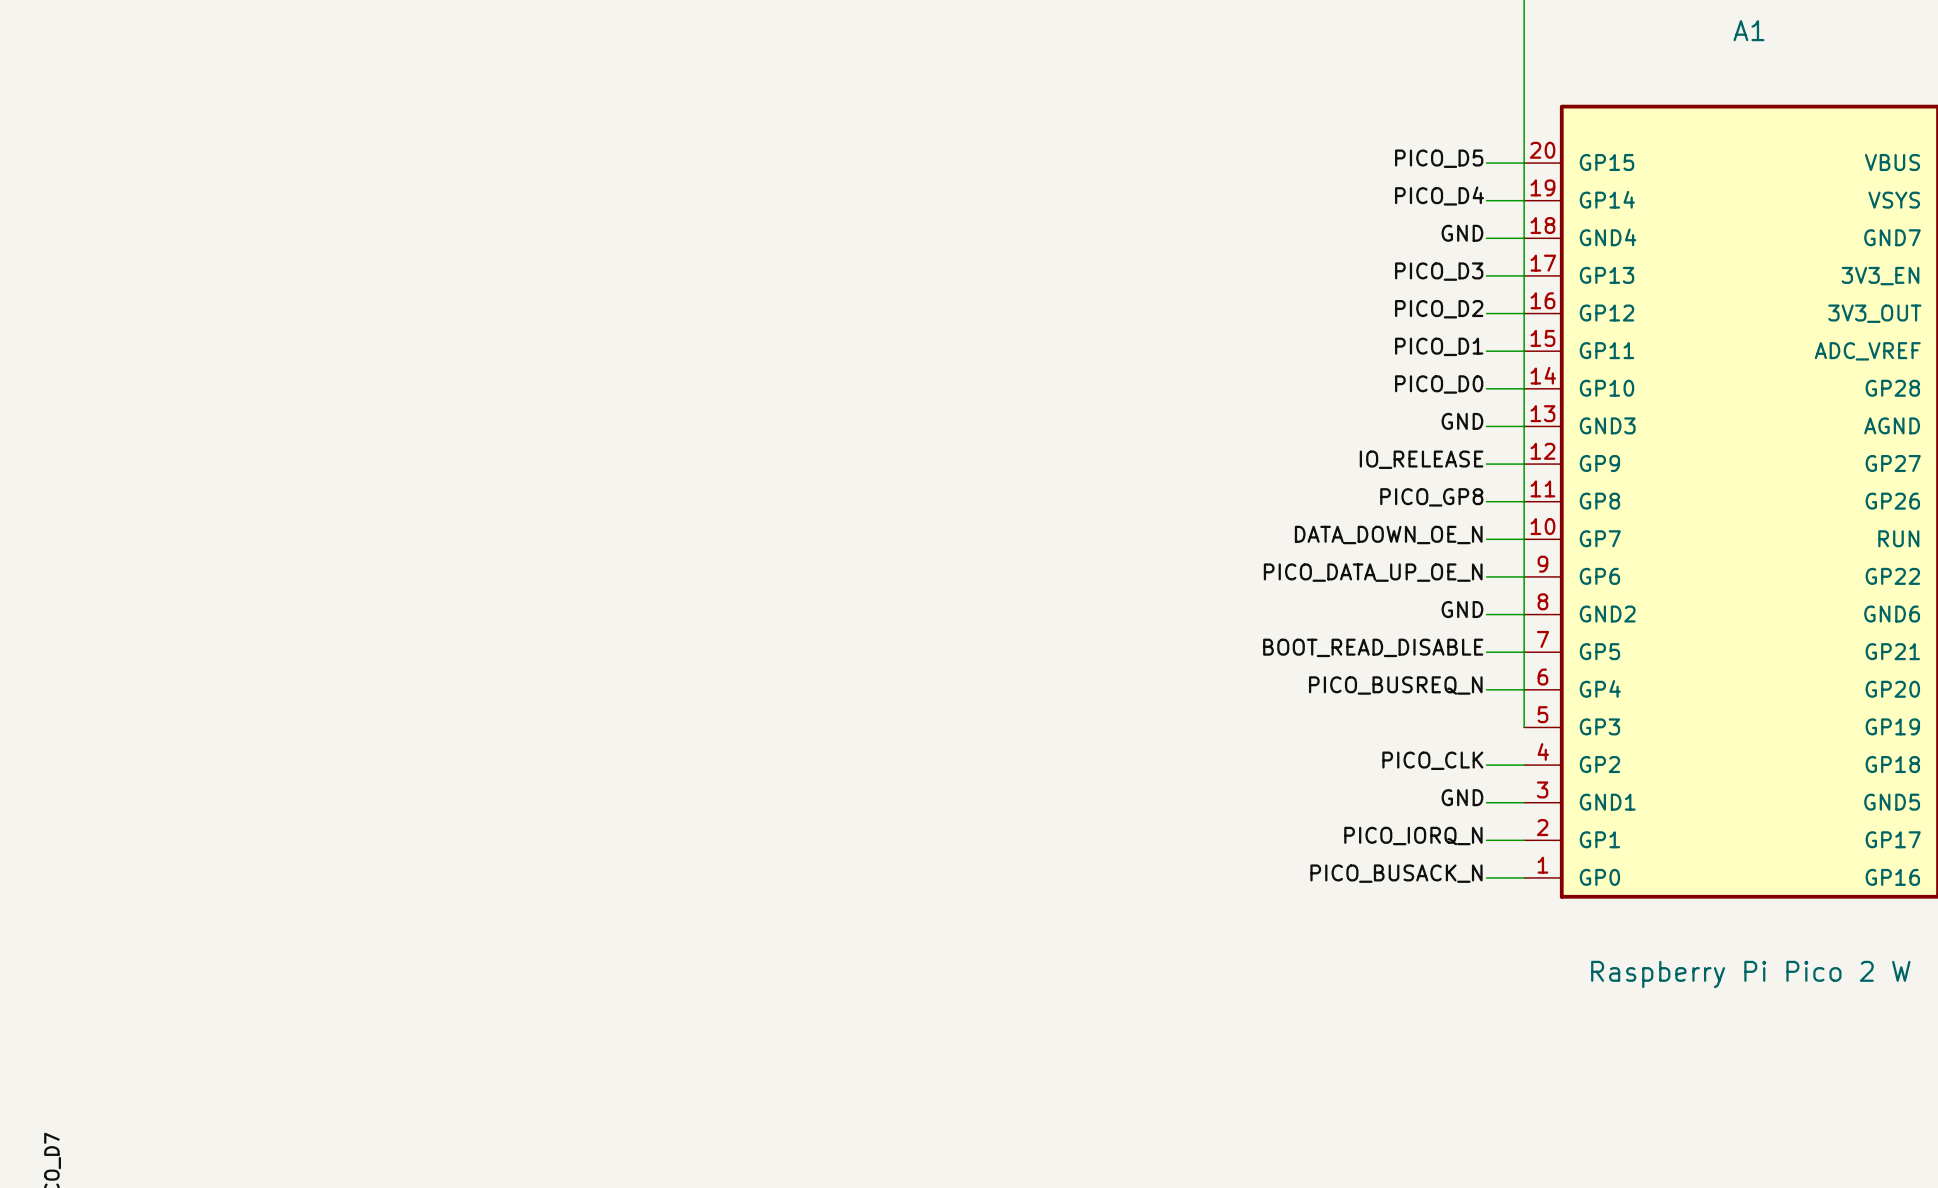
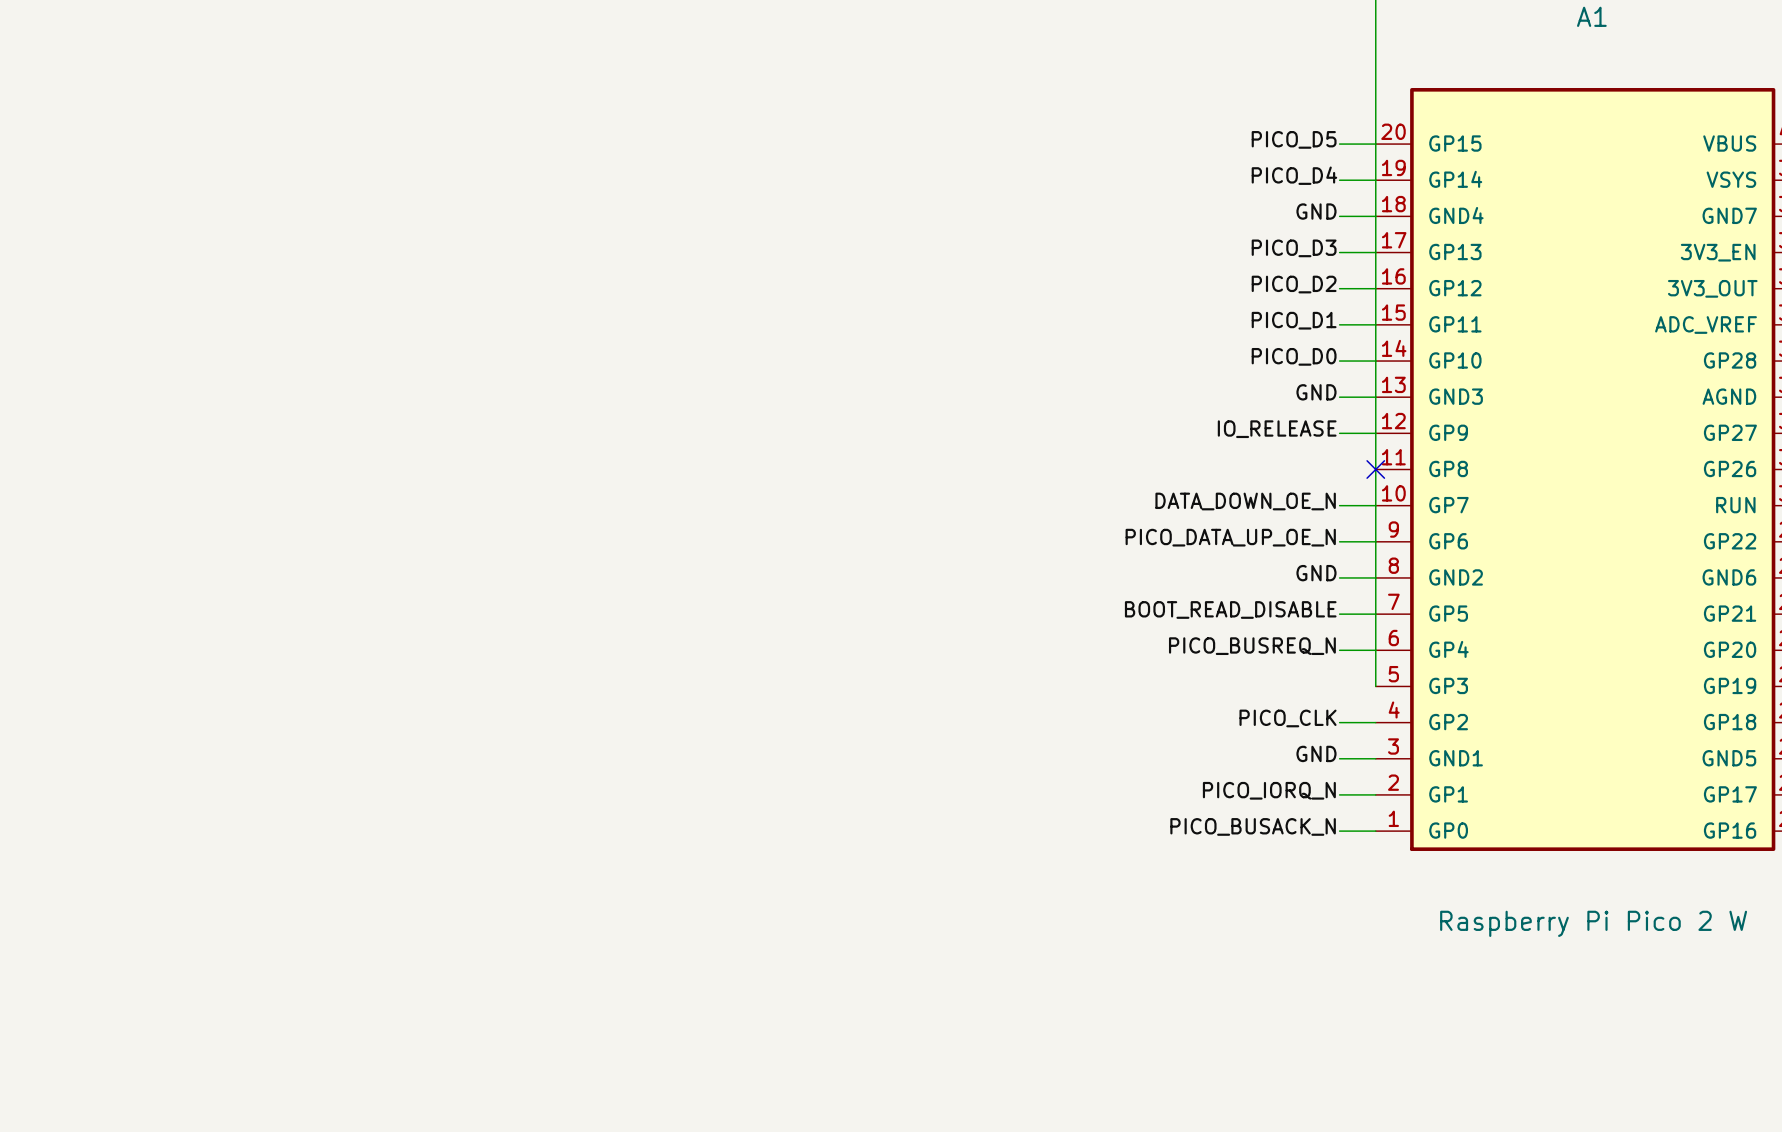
label: PICO_GP8 (1431, 497) -> none
wire: (1486, 501) (1524, 501) -> none
no-connect mark: none -> (1375, 469)

